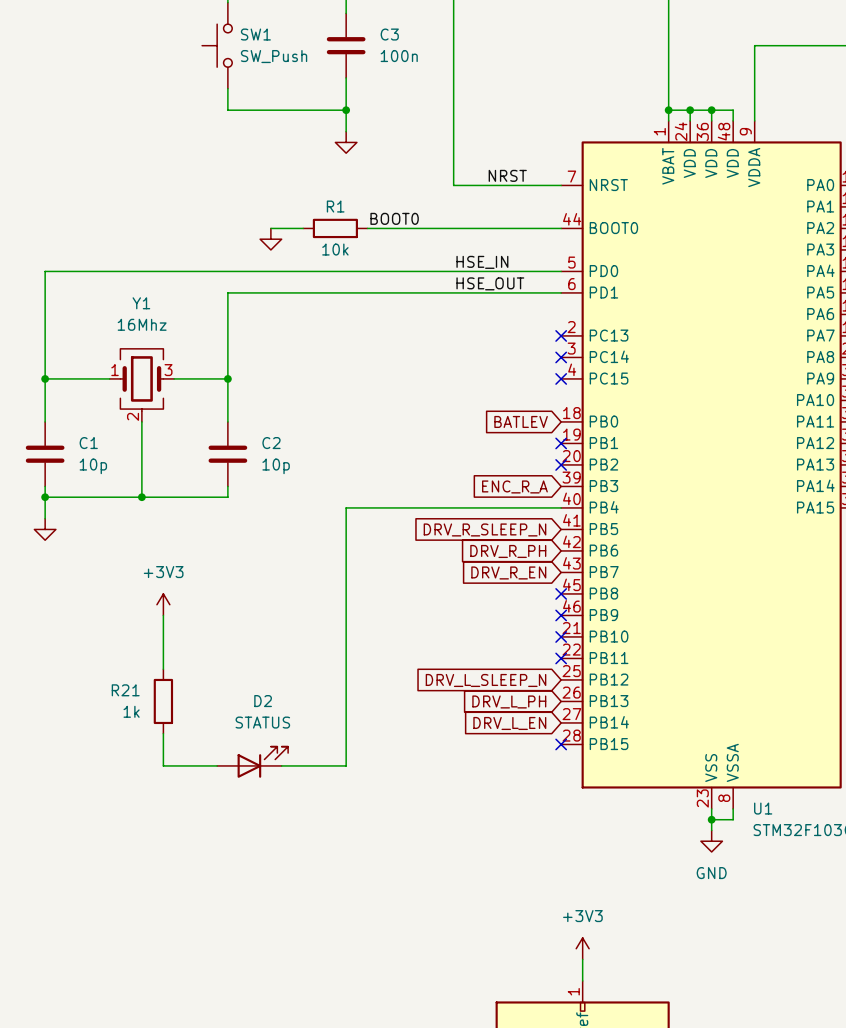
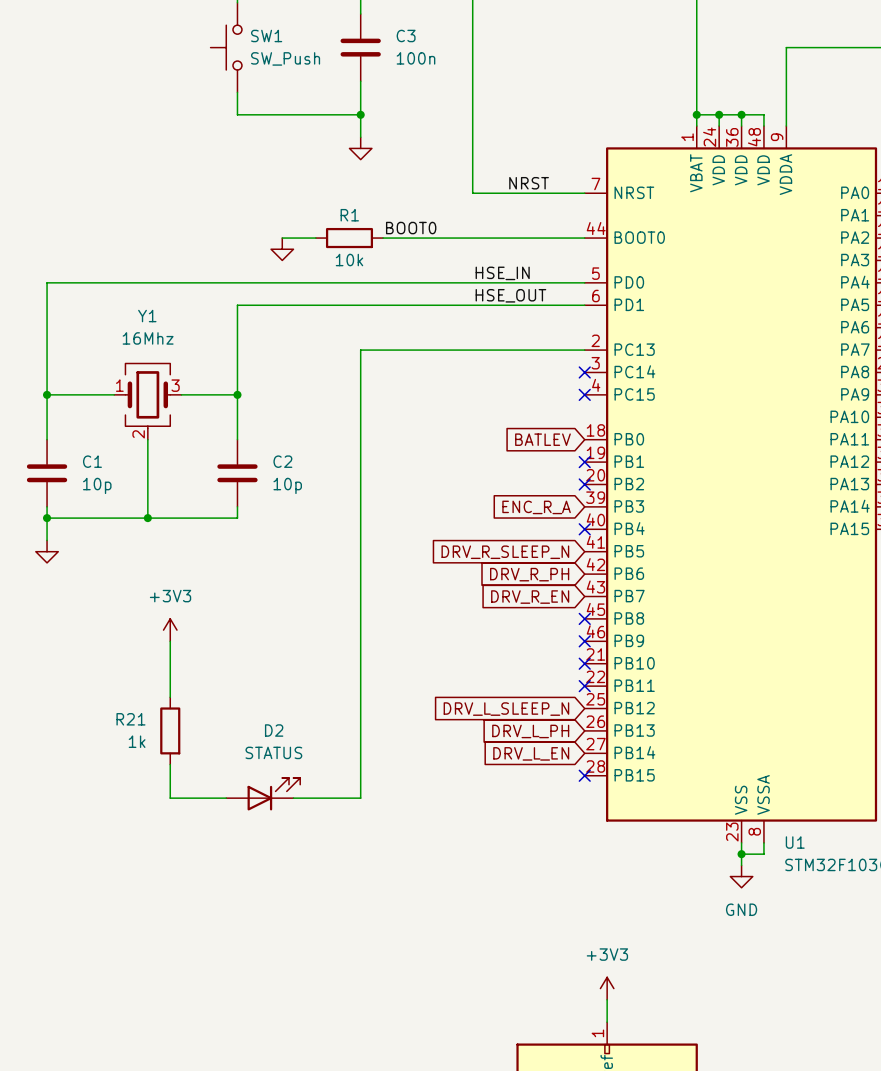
no-connect mark: (561, 335) -> none
wire: (346, 507) (561, 507) -> (360, 529) (360, 350) (584, 350)
no-connect mark: none -> (584, 529)

